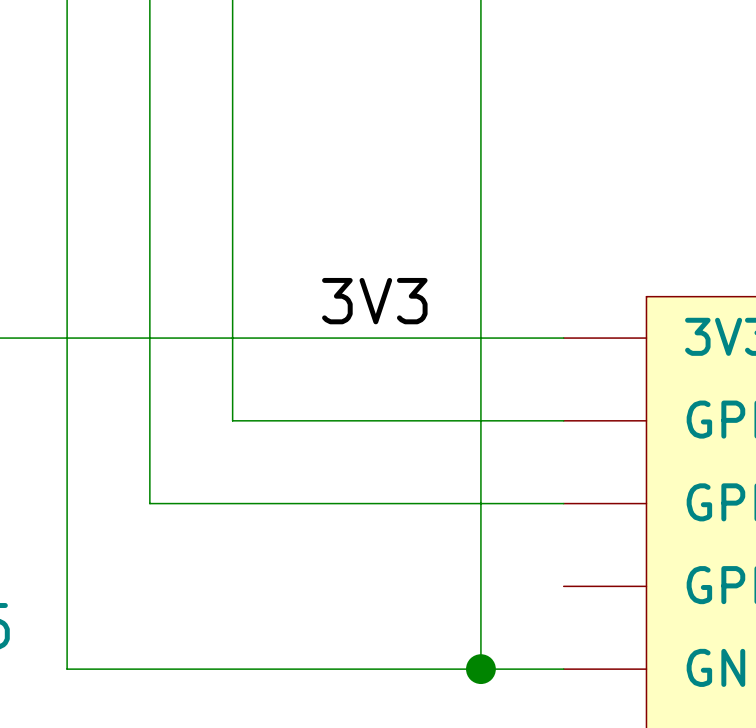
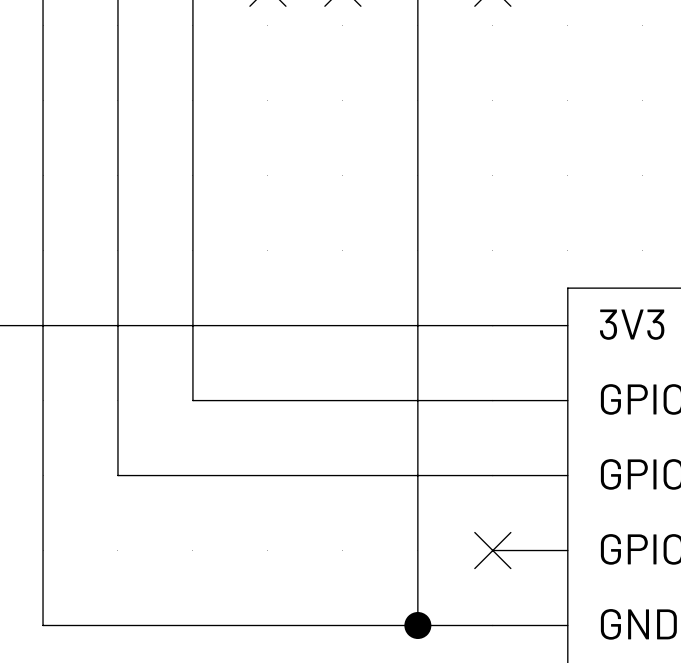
label: 3V3 (374, 301) -> none
no-connect mark: none -> (492, 550)

